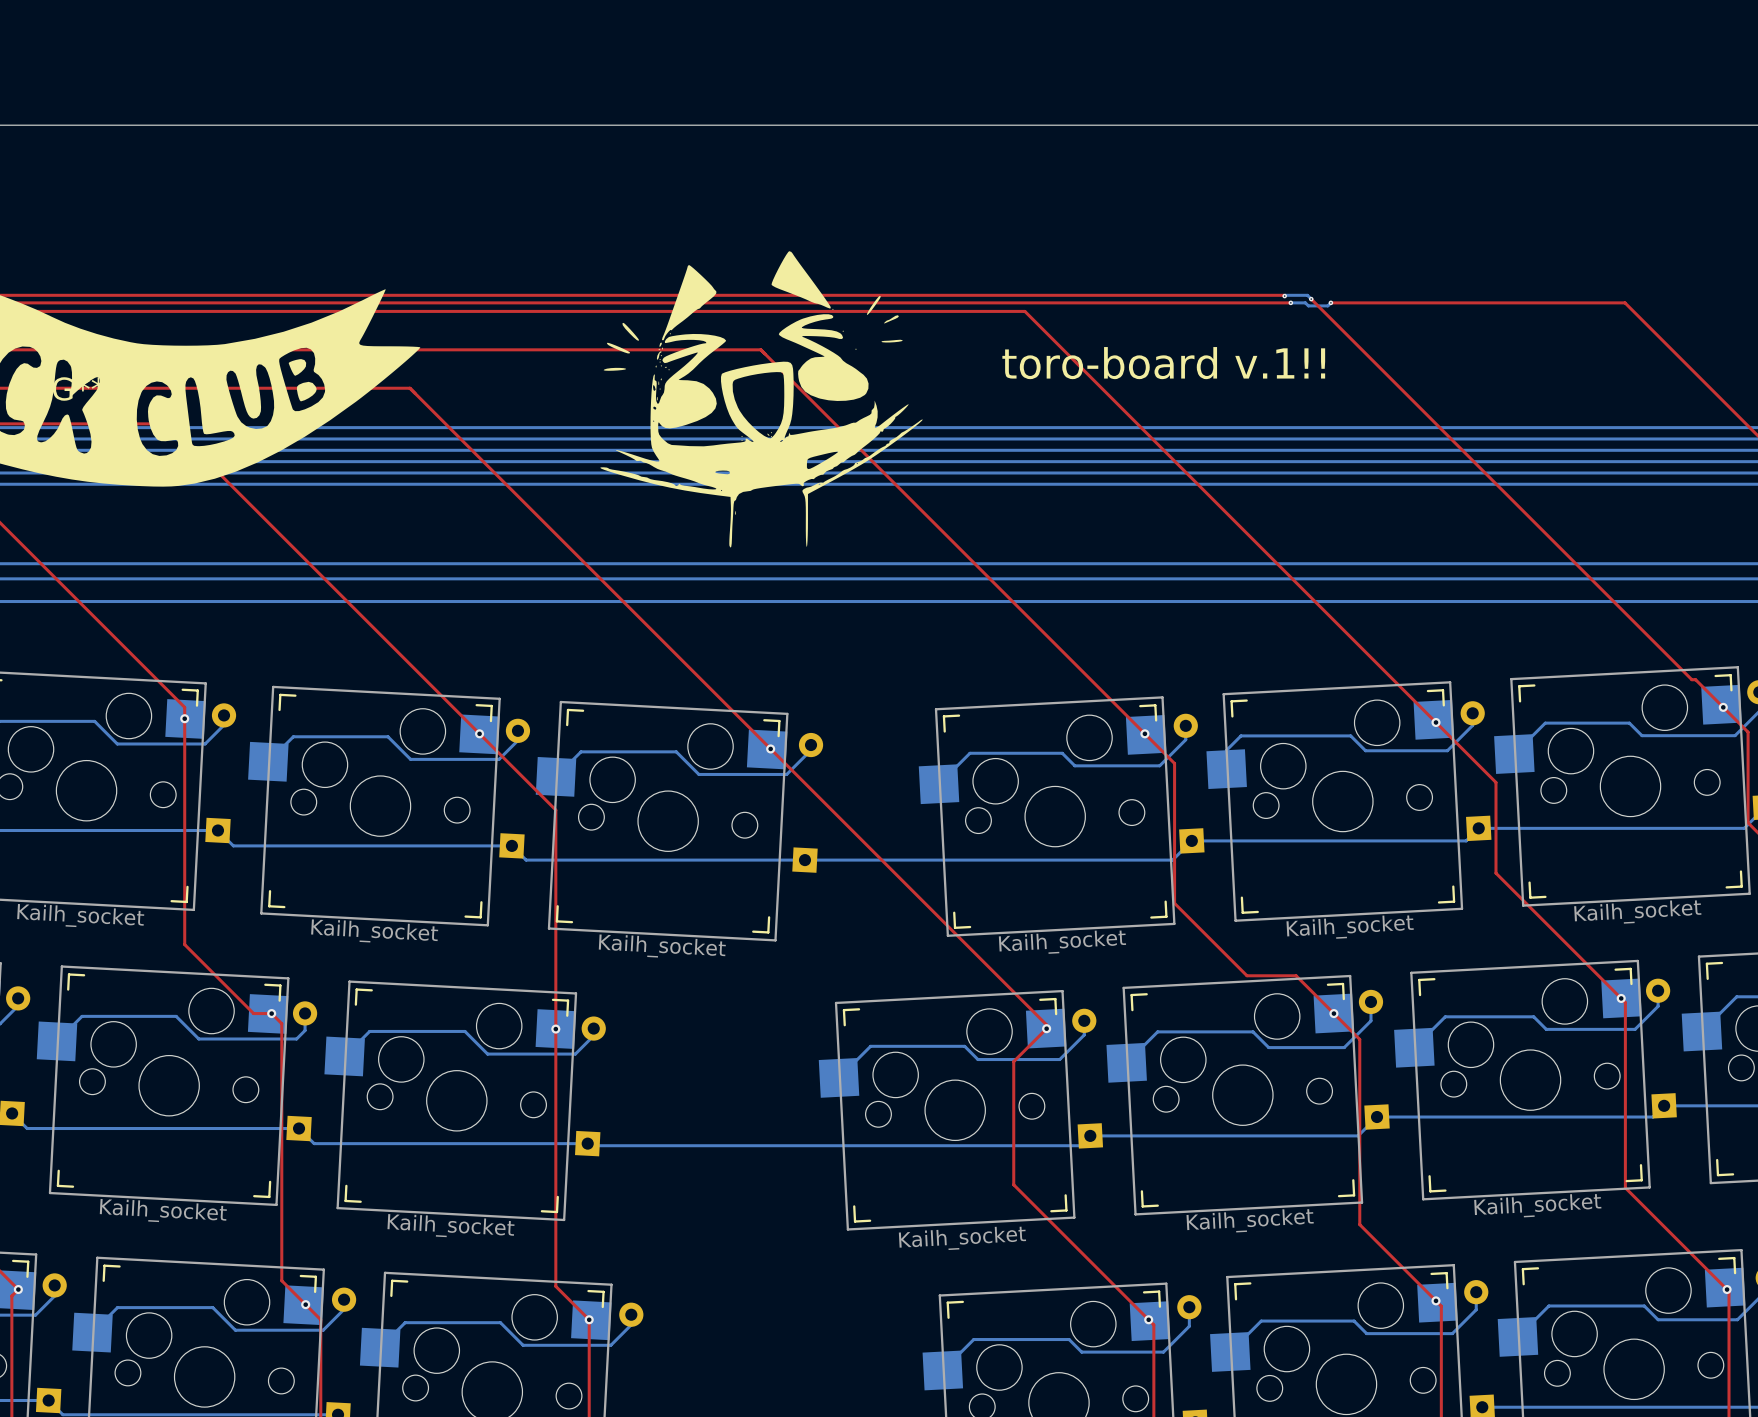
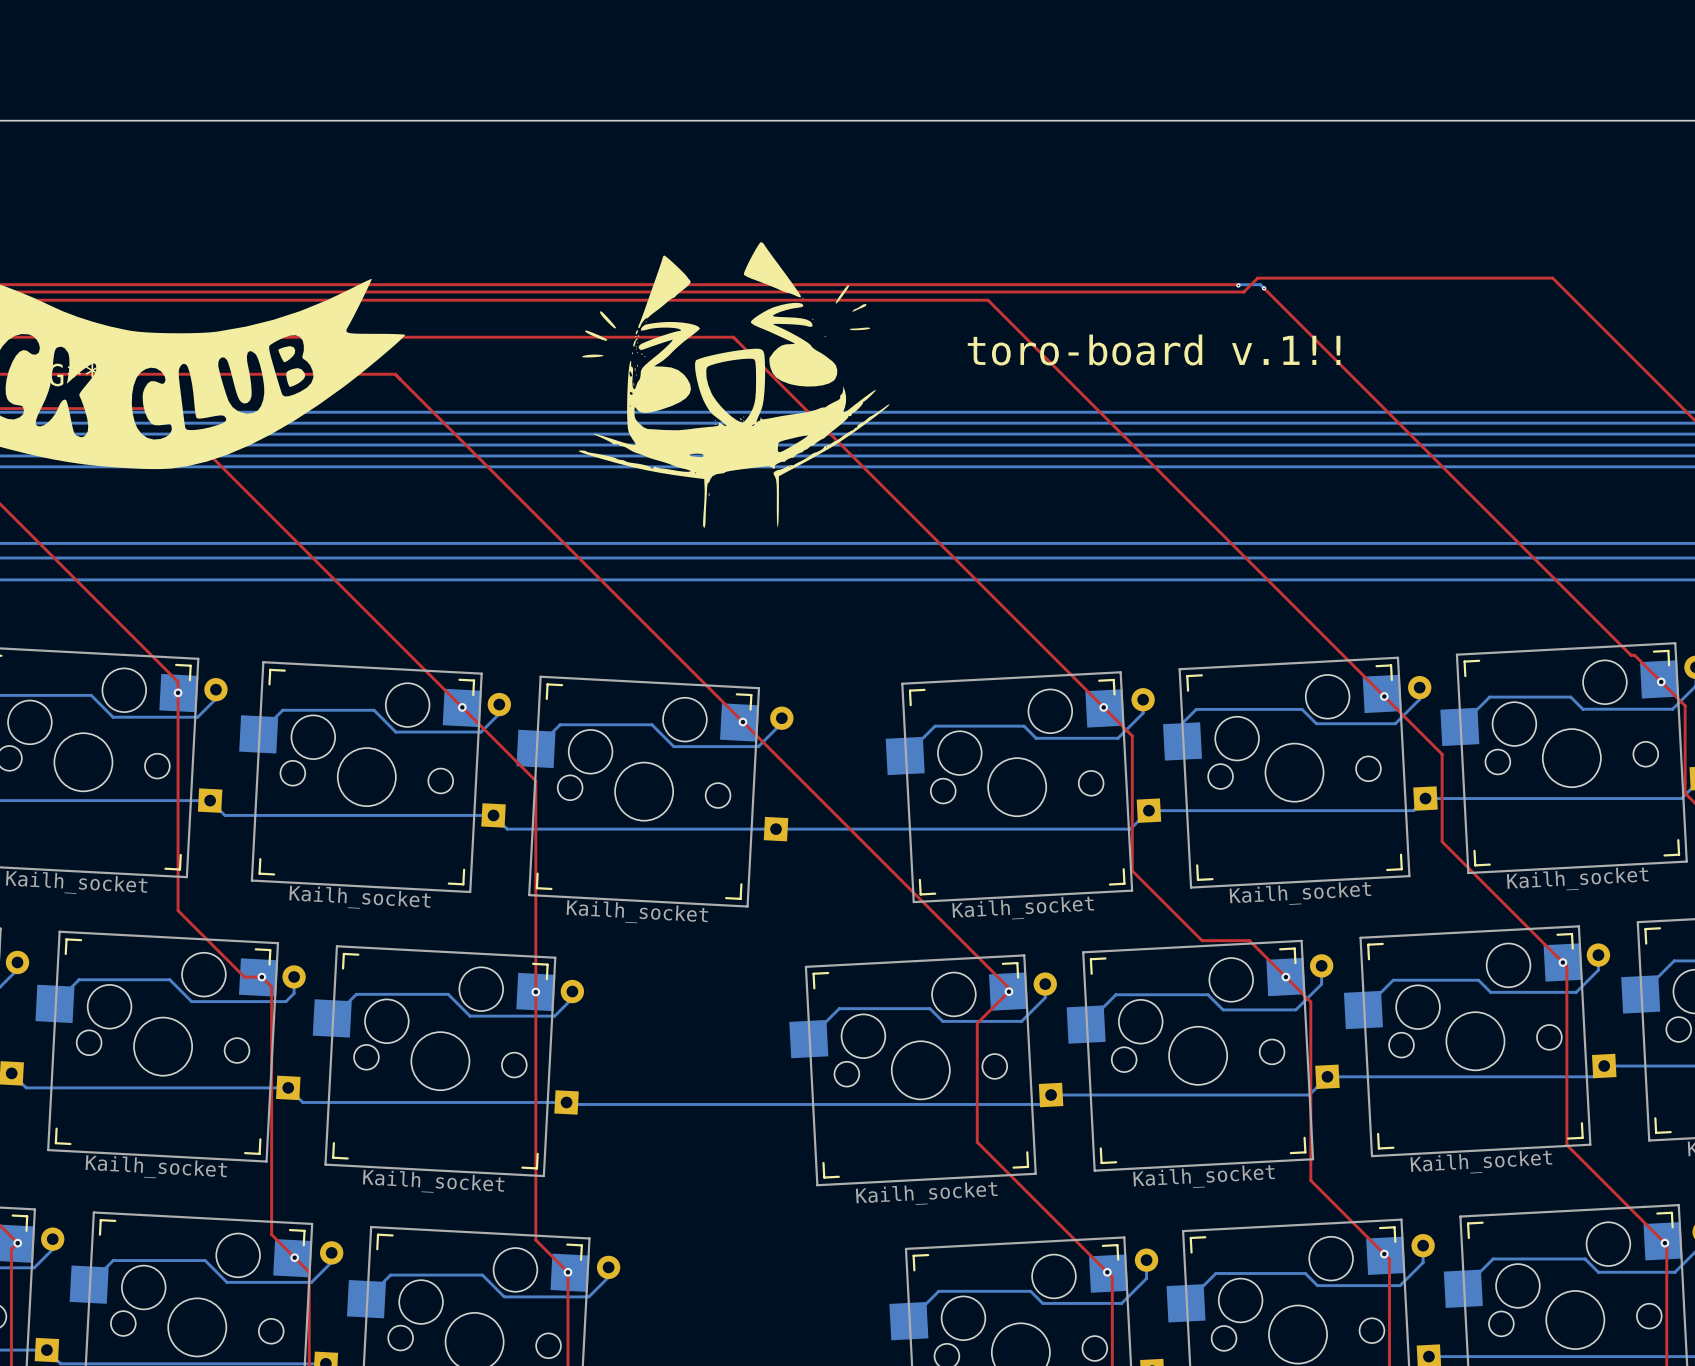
bottom track: (1290, 302) (1305, 302) (1308, 305) (1327, 305) (1330, 302) -> none
via: (1290, 302) -> none
top track: (1330, 302) (1625, 302) -> (1243, 291) (1257, 278) (1552, 278) (1566, 291)
via: (1330, 302) -> none

